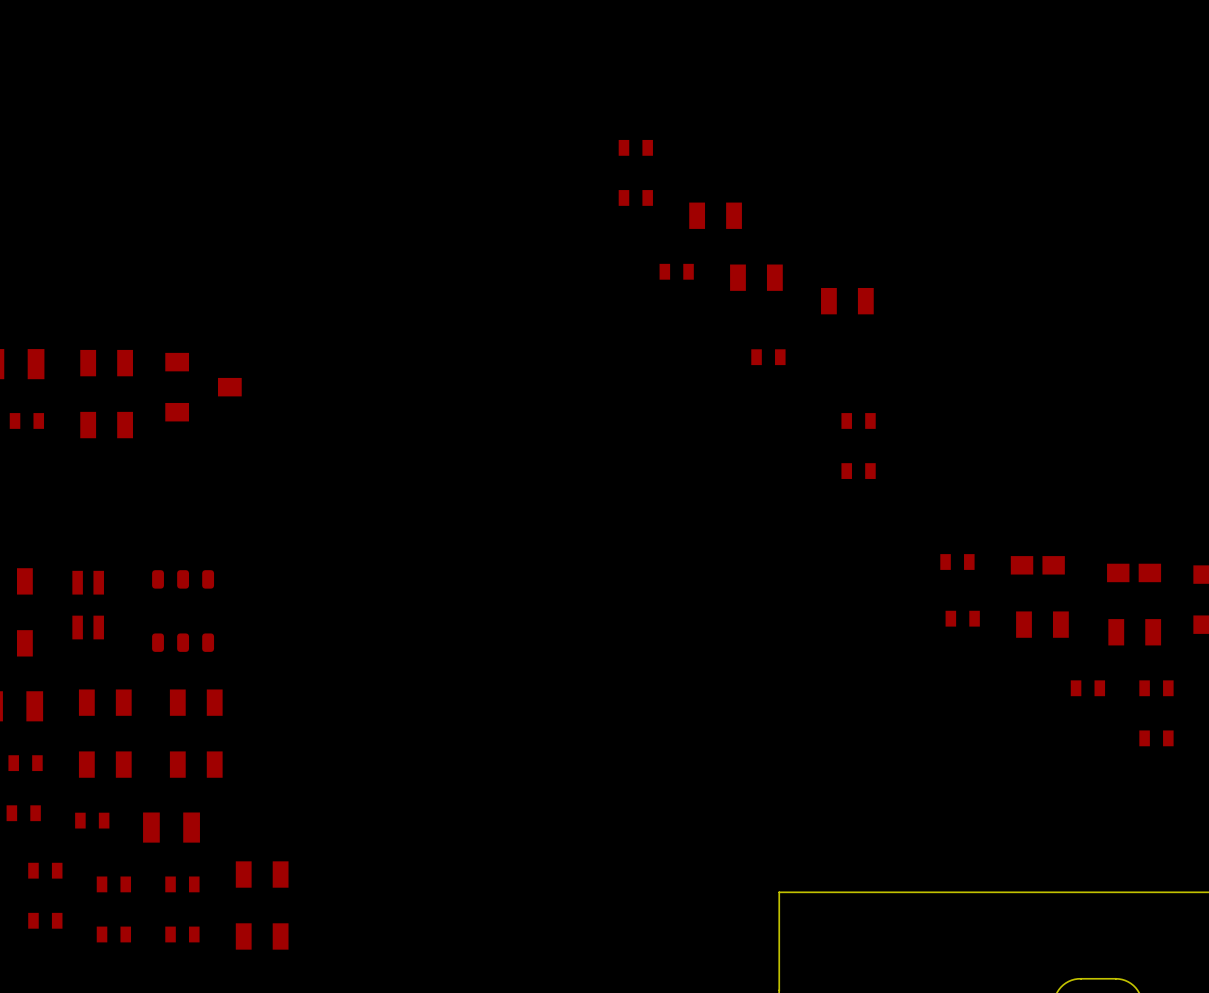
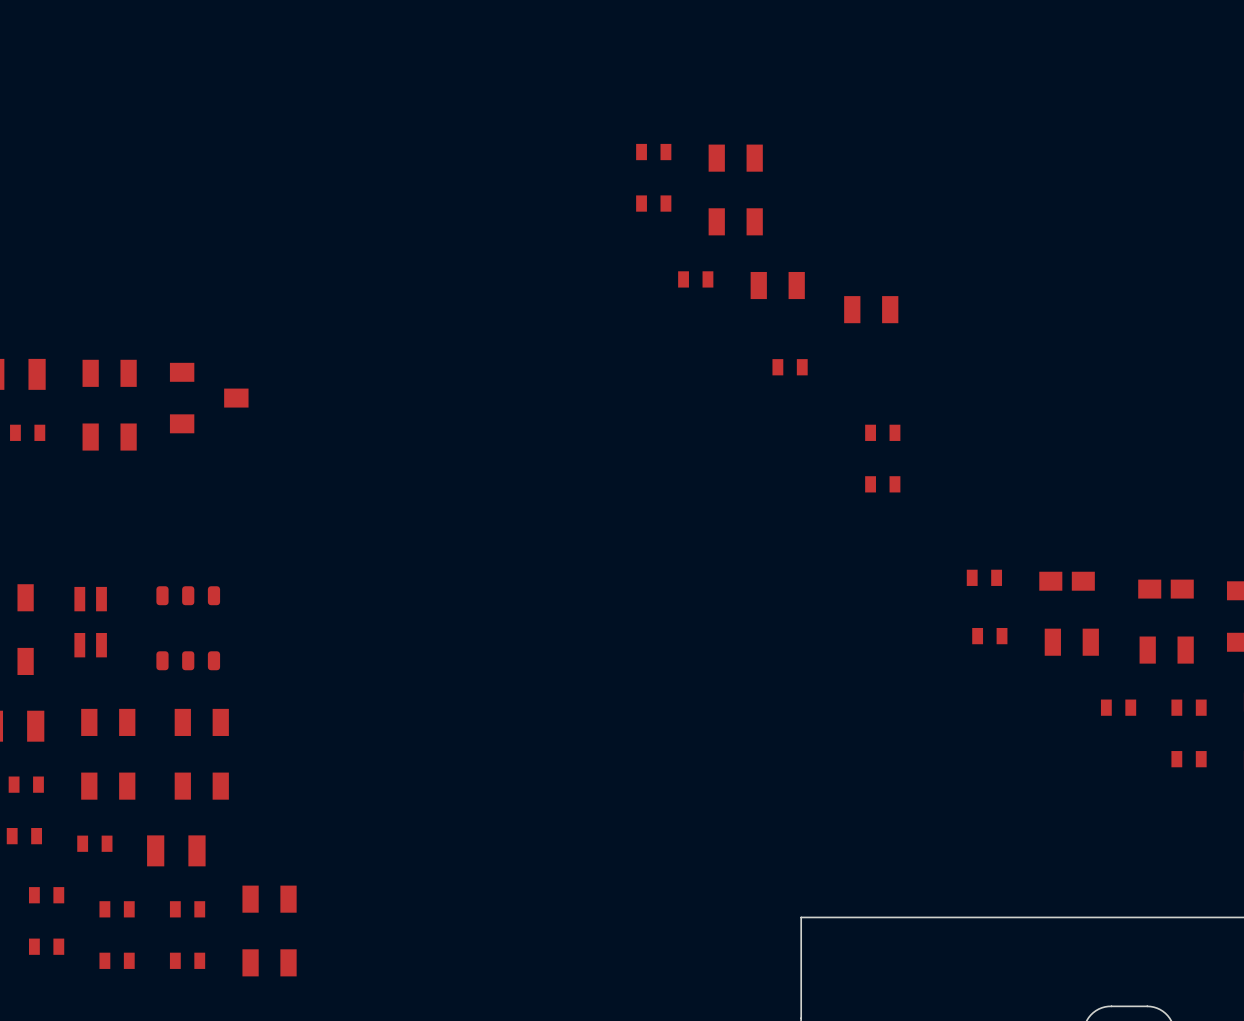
part: none -> (735, 158)

